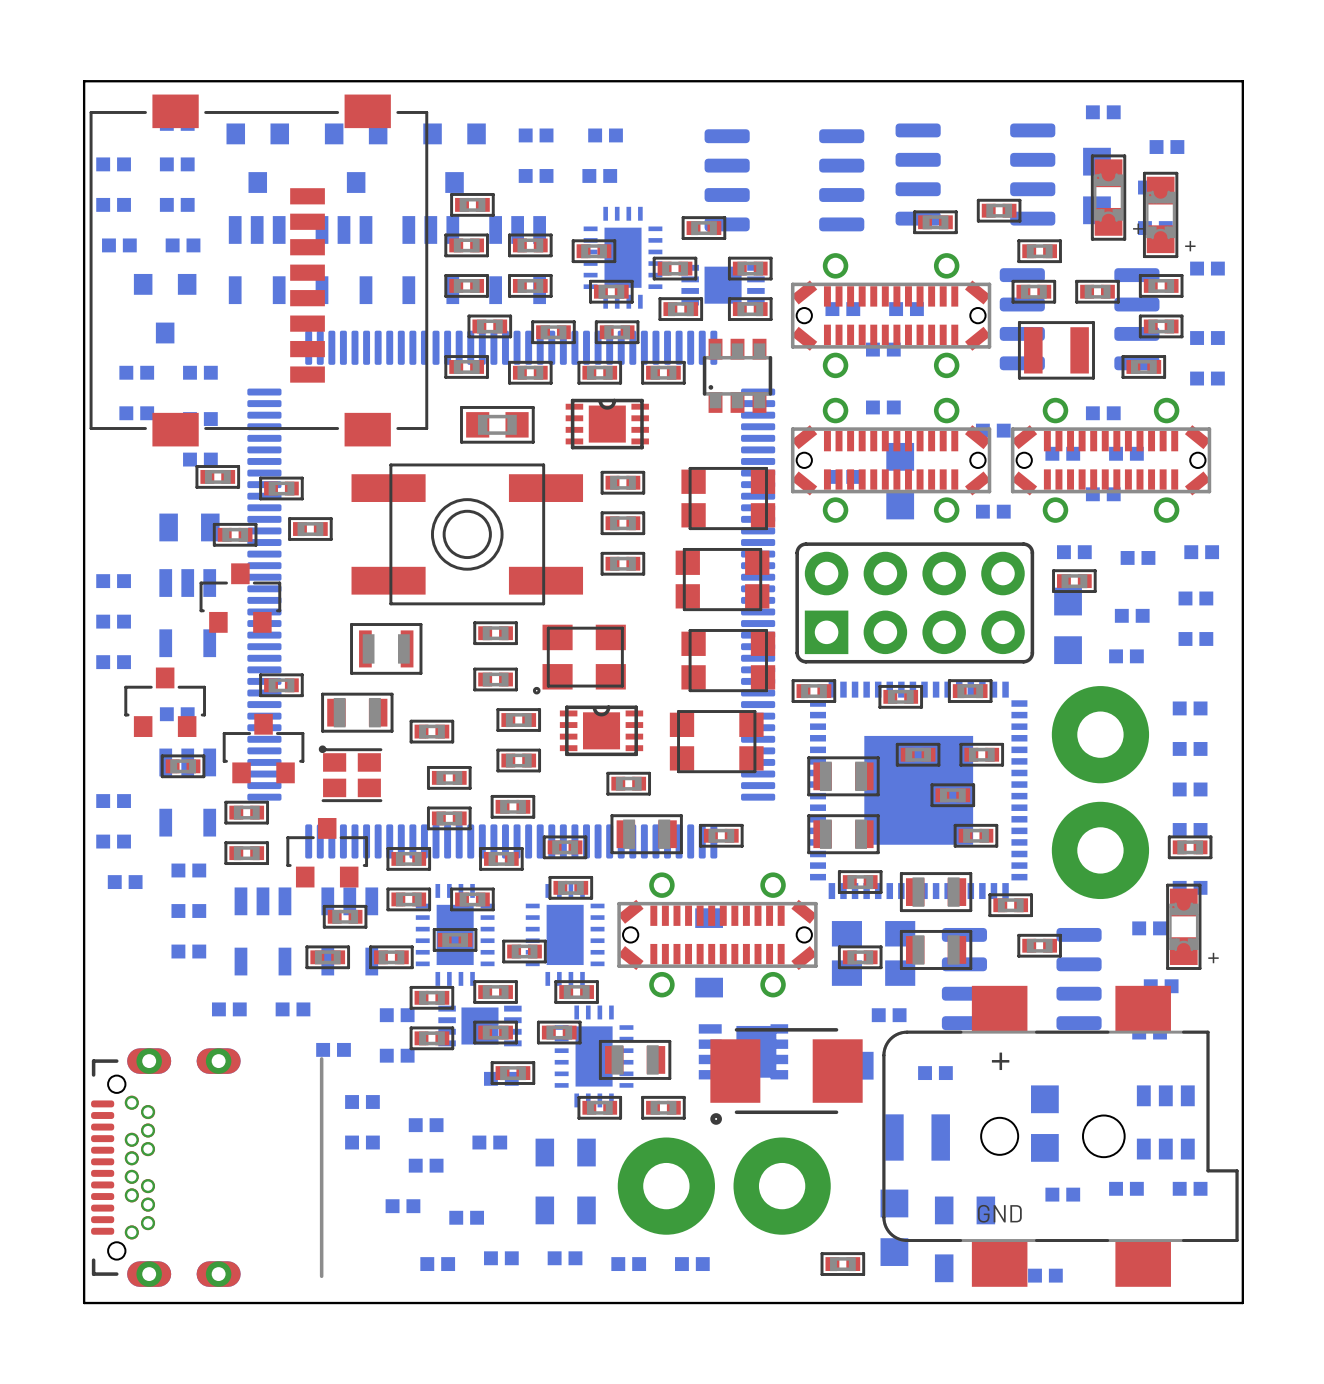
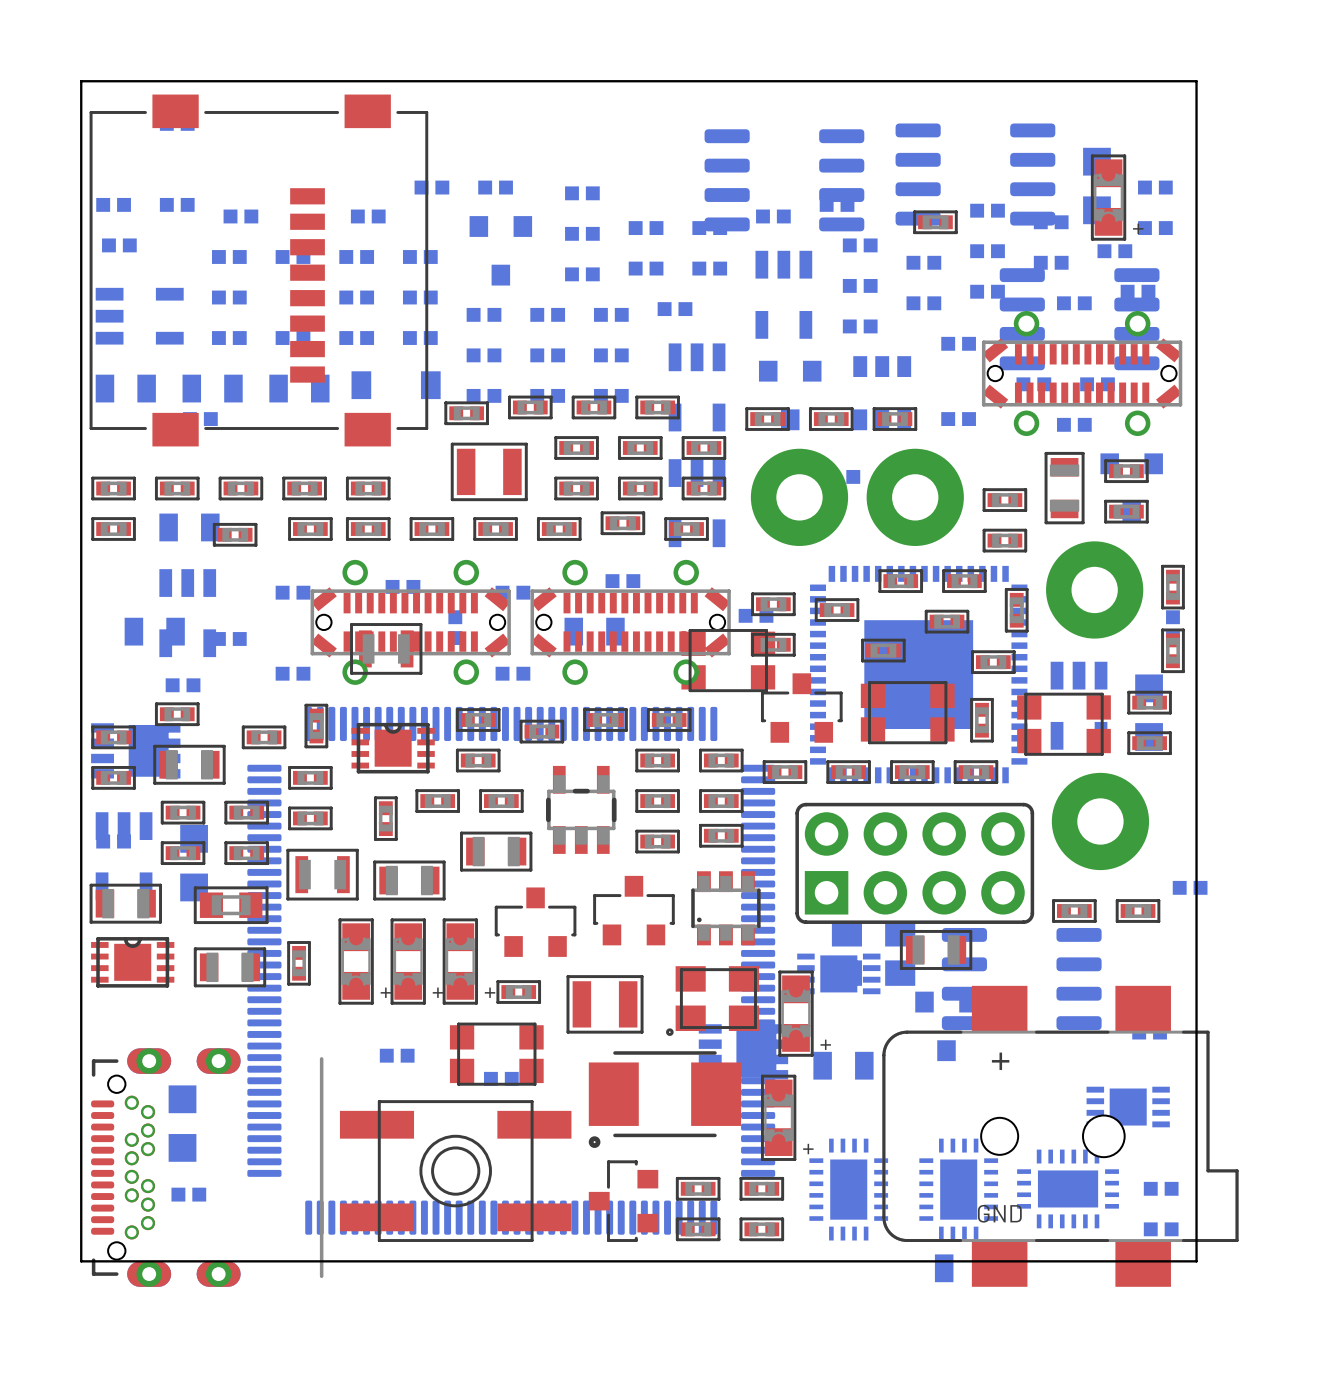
board edge: (84, 81) (84, 1303) (1242, 1303) (1242, 81) (1196, 81) -> (84, 81) (81, 81) (81, 1261) (1196, 1261) (1196, 81)
part: (1103, 112) -> none
part: (536, 135) -> none
part: (605, 135) -> none
part: (1166, 147) -> none
part: (257, 158) -> none
part: (356, 158) -> none
part: (454, 158) -> none
part: (113, 164) -> none
part: (177, 164) -> none
part: (536, 175) -> none
part: (599, 175) -> none
part: none -> (431, 187)
part: none -> (495, 187)
part: none -> (582, 193)
part: (472, 204) -> none
part: none -> (837, 204)
part side: top (999, 210) -> bottom (987, 210)
part: (1160, 214) -> none
part: none -> (240, 216)
part footprint: [315, 216, 373, 305] -> [339, 250, 375, 264]
part: none -> (368, 216)
part footprint: [402, 216, 460, 305] -> [402, 250, 438, 264]
part: none -> (773, 216)
part: none -> (1051, 222)
part: none -> (646, 228)
part side: top (703, 228) -> bottom (709, 228)
part: none -> (582, 233)
part: (183, 245) -> none
part: (466, 245) -> none
part: (530, 245) -> none
part: none -> (860, 245)
part: none -> (500, 250)
part: (593, 251) -> none
part: none -> (987, 251)
part: (1039, 251) -> none
part: none -> (1114, 251)
part: none -> (229, 256)
part: none -> (293, 256)
part: (623, 257) -> none
part rotation: 0° (257, 260) -> 90° counterclockwise (139, 316)
part position: (257, 260) -> (139, 316)
part: (517, 260) -> none
part: none -> (923, 262)
part: none -> (1051, 262)
part: none -> (646, 268)
part: (675, 268) -> none
part: none -> (709, 268)
part: (750, 268) -> none
part: (1207, 268) -> none
part: none -> (582, 274)
part: (466, 285) -> none
part: (530, 285) -> none
part: (723, 285) -> none
part: none -> (860, 285)
part: (1161, 285) -> none
part: (611, 291) -> none
part: none -> (987, 291)
part: (1033, 291) -> none
part: (1097, 291) -> none
part: none -> (1138, 291)
part: none -> (783, 294)
part: none -> (229, 297)
part: none -> (356, 297)
part: none -> (420, 297)
part: none -> (1074, 303)
part: (165, 308) -> none
part side: top (680, 309) -> bottom (675, 309)
part: (750, 309) -> none
part: (842, 309) -> none
part position: (906, 309) -> (923, 303)
part: none -> (547, 314)
part: none -> (611, 314)
part: (891, 315) -> none
part side: top (489, 326) -> bottom (484, 314)
part: none -> (860, 326)
part: (1161, 326) -> none
part footprint: [247, 330, 776, 859] -> [495, 585, 531, 600]
part: (553, 332) -> none
part: (617, 332) -> none
part: none -> (229, 338)
part: none -> (293, 338)
part: none -> (356, 338)
part: none -> (420, 338)
part: (1207, 338) -> none
part: none -> (958, 343)
part: (883, 349) -> none
part: (1056, 350) -> none
part: none -> (484, 355)
part: none -> (547, 355)
part: none -> (611, 355)
part footprint: [183, 365, 218, 380] -> [182, 374, 243, 403]
part: (466, 366) -> none
part: (1143, 366) -> none
part: (136, 372) -> none
part position: (530, 372) -> (530, 407)
part: (599, 372) -> none
part: (663, 372) -> none
part position: (737, 375) -> (725, 908)
part: (1207, 378) -> none
part: none -> (1033, 384)
part: none -> (1097, 384)
part: none -> (396, 385)
part: none -> (697, 387)
part: none -> (125, 388)
part: none -> (299, 388)
part: none -> (882, 393)
part: none -> (484, 395)
part: none -> (547, 395)
part: none -> (611, 395)
part: none -> (790, 395)
part: none -> (593, 407)
part: none -> (657, 407)
part: (883, 407) -> none
part: (136, 413) -> none
part: none -> (466, 413)
part: (1103, 413) -> none
part: none -> (767, 419)
part: none -> (831, 419)
part: none -> (894, 419)
part: none -> (958, 419)
part position: (497, 424) -> (231, 905)
part: (607, 424) -> none
part: none -> (1074, 424)
part: (993, 430) -> none
part: none -> (576, 447)
part: none -> (640, 447)
part: none -> (703, 447)
part: (1062, 453) -> none
part: (1126, 453) -> none
part: (200, 459) -> none
part: (891, 460) -> none
part position: (1111, 460) -> (1082, 373)
part: none -> (489, 471)
part: none -> (1126, 471)
part: (217, 476) -> none
part: (900, 481) -> none
part position: (622, 482) -> (640, 488)
part: none -> (113, 488)
part: none -> (177, 488)
part: none -> (240, 488)
part: (281, 488) -> none
part: none -> (304, 488)
part: none -> (368, 488)
part: none -> (576, 488)
part: none -> (703, 488)
part: none -> (1064, 488)
part: none -> (1131, 488)
part: (1103, 494) -> none
part: none -> (799, 497)
part: none -> (915, 497)
part: (728, 498) -> none
part: none -> (1004, 500)
part: none -> (697, 503)
part: (993, 511) -> none
part: none -> (1126, 511)
part: none -> (113, 529)
part: none -> (368, 529)
part: none -> (431, 529)
part: none -> (495, 529)
part: none -> (559, 529)
part: none -> (686, 529)
part: (467, 534) -> none
part: none -> (1004, 540)
part: (1074, 552) -> none
part: (1201, 552) -> none
part: (1138, 557) -> none
part side: top (622, 563) -> bottom (622, 581)
part: (722, 579) -> none
part: (113, 581) -> none
part: none -> (900, 581)
part: none -> (964, 581)
part: (1074, 581) -> none
part: none -> (402, 586)
part: none -> (1172, 587)
part: none -> (1094, 589)
part: none -> (293, 592)
part: (240, 598) -> none
part: (1195, 598) -> none
part position: (914, 602) -> (914, 863)
part: none -> (773, 604)
part: none -> (837, 610)
part: none -> (1016, 610)
part: none -> (756, 615)
part: (1132, 615) -> none
part: (113, 621) -> none
part: none -> (947, 621)
part: none -> (410, 622)
part: none -> (630, 622)
part position: (1068, 625) -> (1149, 712)
part: none -> (455, 627)
part: none -> (1172, 627)
part: none -> (154, 631)
part: none -> (594, 631)
part: (495, 633) -> none
part: none -> (229, 638)
part: (1195, 638) -> none
part: none -> (773, 644)
part: none -> (883, 650)
part: none -> (1172, 650)
part: (1126, 656) -> none
part position: (579, 659) -> (712, 1001)
part: (113, 662) -> none
part: none -> (993, 662)
part side: top (495, 679) -> bottom (512, 673)
part footprint: [791, 679, 837, 703] -> [760, 673, 843, 743]
part: none -> (183, 685)
part side: top (281, 685) -> bottom (293, 673)
part: (970, 691) -> none
part: (900, 696) -> none
part: (165, 702) -> none
part: none -> (1149, 702)
part footprint: [559, 705, 644, 757] -> [583, 708, 628, 732]
part: none -> (1079, 705)
part: (1190, 708) -> none
part footprint: [669, 710, 764, 774] -> [699, 748, 744, 773]
part: (357, 712) -> none
part: none -> (907, 712)
part footprint: [222, 713, 305, 784] -> [241, 725, 287, 750]
part side: bottom (177, 714) -> top (177, 714)
part: none -> (478, 720)
part: (518, 720) -> none
part: none -> (669, 720)
part: none -> (981, 720)
part: none -> (1063, 724)
part: none -> (316, 726)
part: (431, 731) -> none
part: none -> (541, 731)
part: (1100, 734) -> none
part: none -> (113, 737)
part: none -> (1149, 743)
part: none -> (393, 748)
part: (1190, 748) -> none
part: none -> (135, 750)
part footprint: [160, 754, 206, 779] -> [153, 744, 226, 785]
part position: (918, 754) -> (912, 772)
part: (981, 754) -> none
part footprint: [807, 756, 880, 797] -> [826, 760, 871, 784]
part: none -> (478, 760)
part: (518, 760) -> none
part: none -> (657, 760)
part: none -> (975, 772)
part: (350, 773) -> none
part: none -> (310, 777)
part: (449, 777) -> none
part: (628, 783) -> none
part: (1190, 789) -> none
part position: (918, 790) -> (918, 674)
part position: (187, 792) -> (124, 856)
part: (952, 795) -> none
part side: bottom (113, 801) -> top (113, 777)
part: none -> (437, 801)
part: none -> (657, 801)
part: none -> (721, 801)
part position: (512, 806) -> (501, 801)
part: none -> (183, 812)
part footprint: [610, 814, 683, 855] -> [635, 829, 680, 854]
part: none -> (310, 818)
part: none -> (385, 818)
part: (449, 818) -> none
part: (1190, 829) -> none
part: (843, 834) -> none
part: (975, 835) -> none
part footprint: [479, 847, 524, 871] -> [460, 831, 533, 872]
part: (565, 847) -> none
part: (1190, 847) -> none
part position: (1100, 850) -> (1100, 821)
part: (327, 852) -> none
part: none -> (183, 853)
part: (408, 858) -> none
part: none -> (194, 863)
part: (188, 870) -> none
part: none -> (322, 874)
part: none -> (409, 880)
part: (125, 882) -> none
part: (860, 882) -> none
part: (570, 887) -> none
part: (936, 892) -> none
part: (408, 899) -> none
part: (472, 899) -> none
part: none -> (125, 903)
part: (1010, 905) -> none
part: none -> (633, 910)
part: (188, 911) -> none
part: none -> (1074, 911)
part: (345, 916) -> none
part: none -> (535, 922)
part: (1183, 926) -> none
part side: bottom (1149, 928) -> top (1138, 911)
part side: bottom (262, 931) -> top (581, 809)
part: (349, 931) -> none
part: (455, 934) -> none
part: (565, 934) -> none
part: (717, 934) -> none
part: (455, 939) -> none
part footprint: [369, 945, 414, 970] -> [390, 918, 426, 1005]
part: (1039, 945) -> none
part: (188, 951) -> none
part: (524, 951) -> none
part: (709, 952) -> none
part rotation: 0° (327, 957) -> 90° clockwise (299, 963)
part position: (327, 957) -> (299, 963)
part: (860, 957) -> none
part: none -> (356, 961)
part: none -> (460, 961)
part: none -> (132, 962)
part: none -> (229, 967)
part: none -> (511, 970)
part: none -> (838, 973)
part: (1161, 986) -> none
part: (495, 992) -> none
part: none -> (518, 992)
part: (576, 992) -> none
part: (431, 997) -> none
part: none -> (605, 1004)
part: (229, 1009) -> none
part: (293, 1009) -> none
part: none -> (796, 1013)
part: (397, 1015) -> none
part: (889, 1015) -> none
part: (479, 1026) -> none
part: none -> (946, 1026)
part: (495, 1032) -> none
part: (559, 1032) -> none
part: (431, 1038) -> none
part: (333, 1049) -> none
part: none -> (496, 1054)
part: (594, 1056) -> none
part: (635, 1059) -> none
part: (512, 1073) -> none
part: (935, 1073) -> none
part: (786, 1076) -> none
part footprint: [641, 1095, 686, 1120] -> [588, 1051, 742, 1148]
part: (362, 1102) -> none
part: (599, 1107) -> none
part: none -> (1128, 1107)
part: none -> (778, 1117)
part: (1165, 1122) -> none
part: none -> (182, 1123)
part: (1044, 1123) -> none
part: (426, 1125) -> none
part footprint: [733, 1137, 831, 1235] -> [739, 1176, 785, 1201]
part: (917, 1137) -> none
part: (362, 1142) -> none
part: (489, 1142) -> none
part: (565, 1152) -> none
part: (426, 1165) -> none
part: none -> (455, 1171)
part: (666, 1186) -> none
part footprint: [1045, 1187, 1081, 1202] -> [1017, 1149, 1119, 1229]
part: none -> (698, 1188)
part: (1126, 1188) -> none
part: none -> (1161, 1188)
part: (1190, 1188) -> none
part: none -> (848, 1189)
part: none -> (188, 1194)
part footprint: [934, 1196, 996, 1225] -> [919, 1138, 999, 1241]
part: none -> (623, 1201)
part: (402, 1206) -> none
part: (565, 1210) -> none
part: (466, 1217) -> none
part: (894, 1227) -> none
part: none -> (698, 1229)
part: none -> (761, 1229)
part: none -> (1161, 1229)
part: (501, 1258) -> none
part: (565, 1258) -> none
part: (437, 1264) -> none
part: (628, 1264) -> none
part: (692, 1264) -> none
part: (842, 1264) -> none
part side: bottom (1045, 1275) -> top (784, 772)

